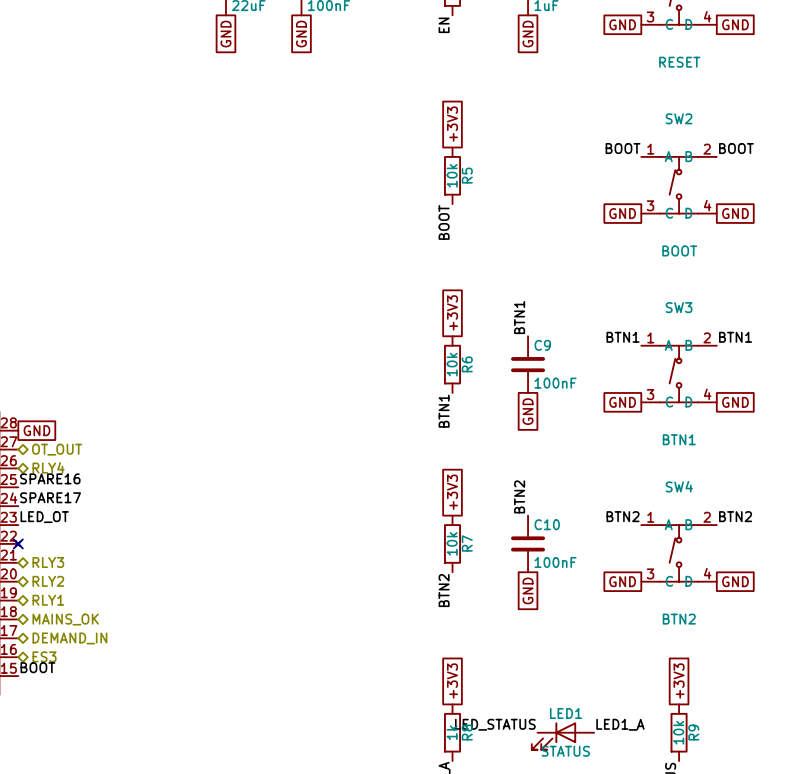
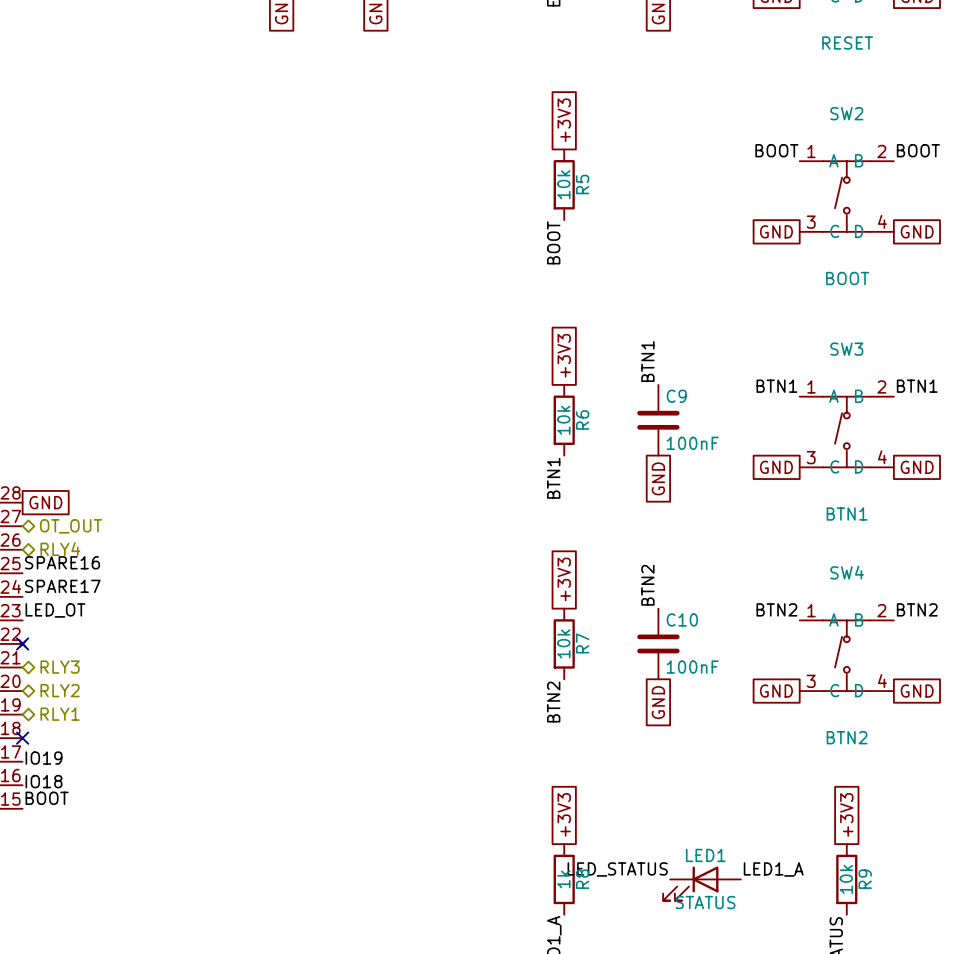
no-connect mark: none -> (22, 738)
hierarchical label: MAINS_OK (65, 619) -> none
label: none -> IO19 (44, 758)
hierarchical label: DEMAND_IN (69, 638) -> none
label: none -> IO18 (44, 781)
hierarchical label: ES3 (44, 656) -> none

